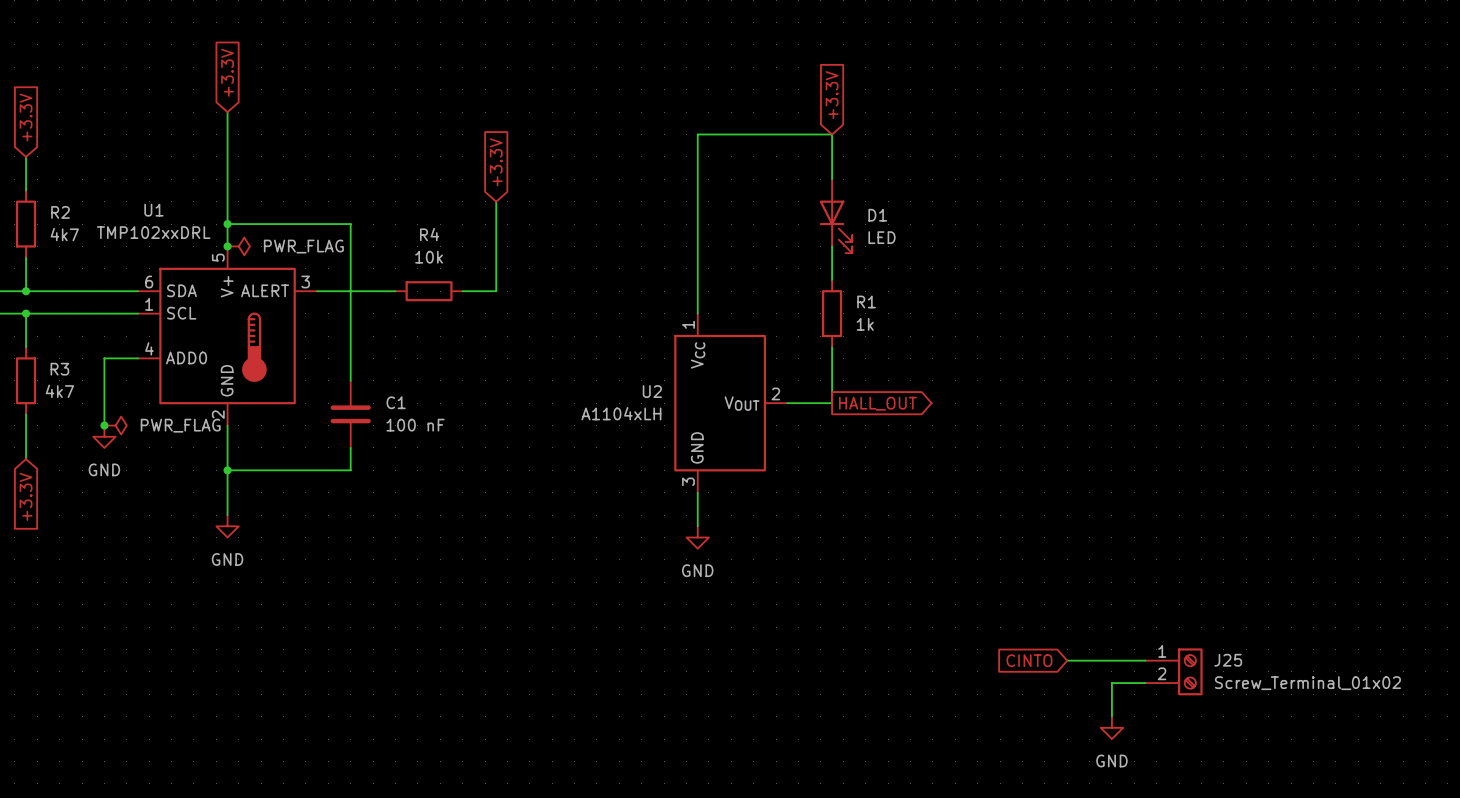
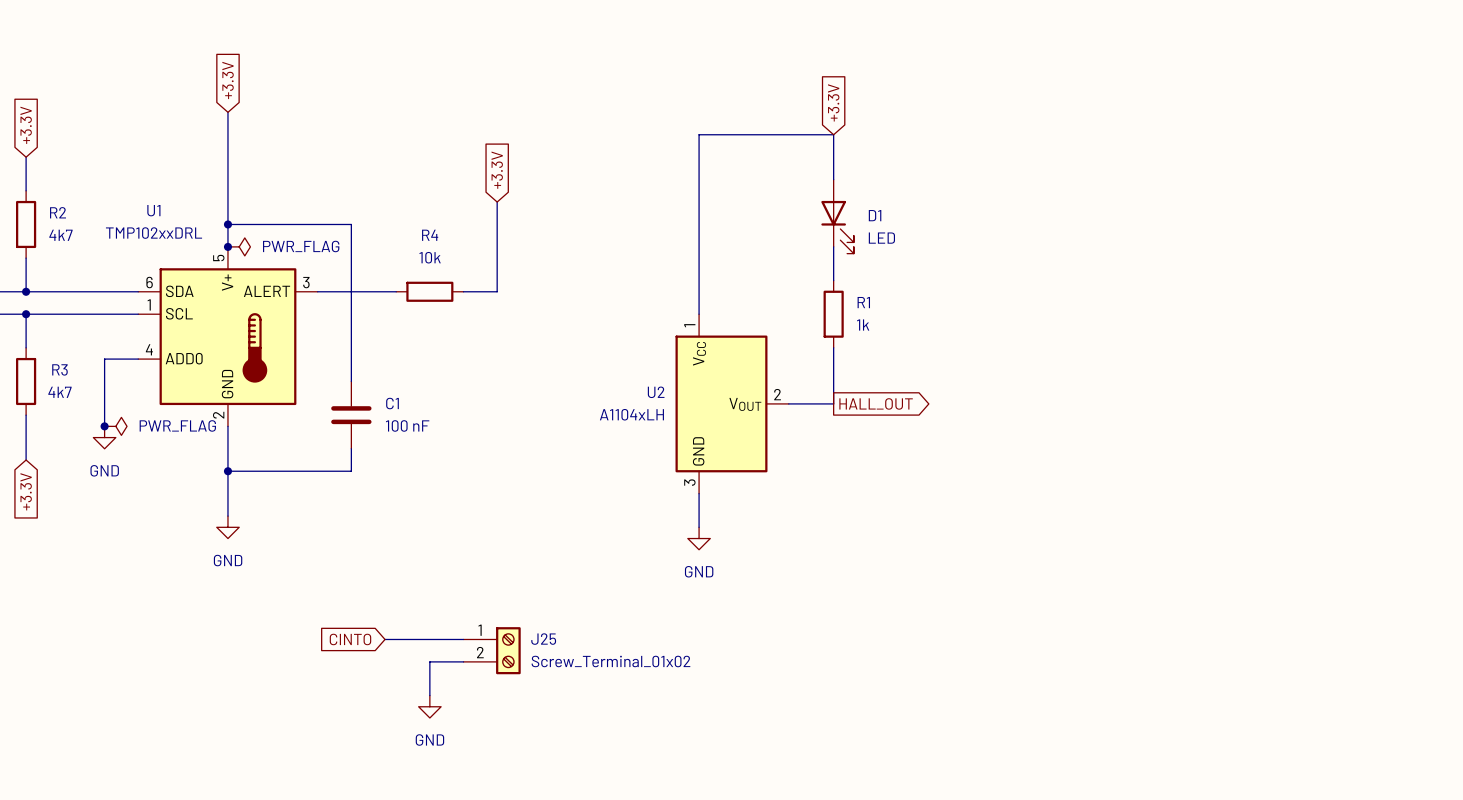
global label: none -> CINTO (350, 639)
wire: none -> (385, 639) (463, 639)
wire: none -> (463, 661) (429, 661) (429, 695)
global label: CINTO (1029, 660) -> none
wire: (1067, 660) (1145, 660) -> none
J25 position: (1174, 671) -> (492, 650)
wire: (1145, 683) (1111, 683) (1111, 716) -> none
power symbol: none -> GND (429, 706)
power symbol: GND (1111, 727) -> none

